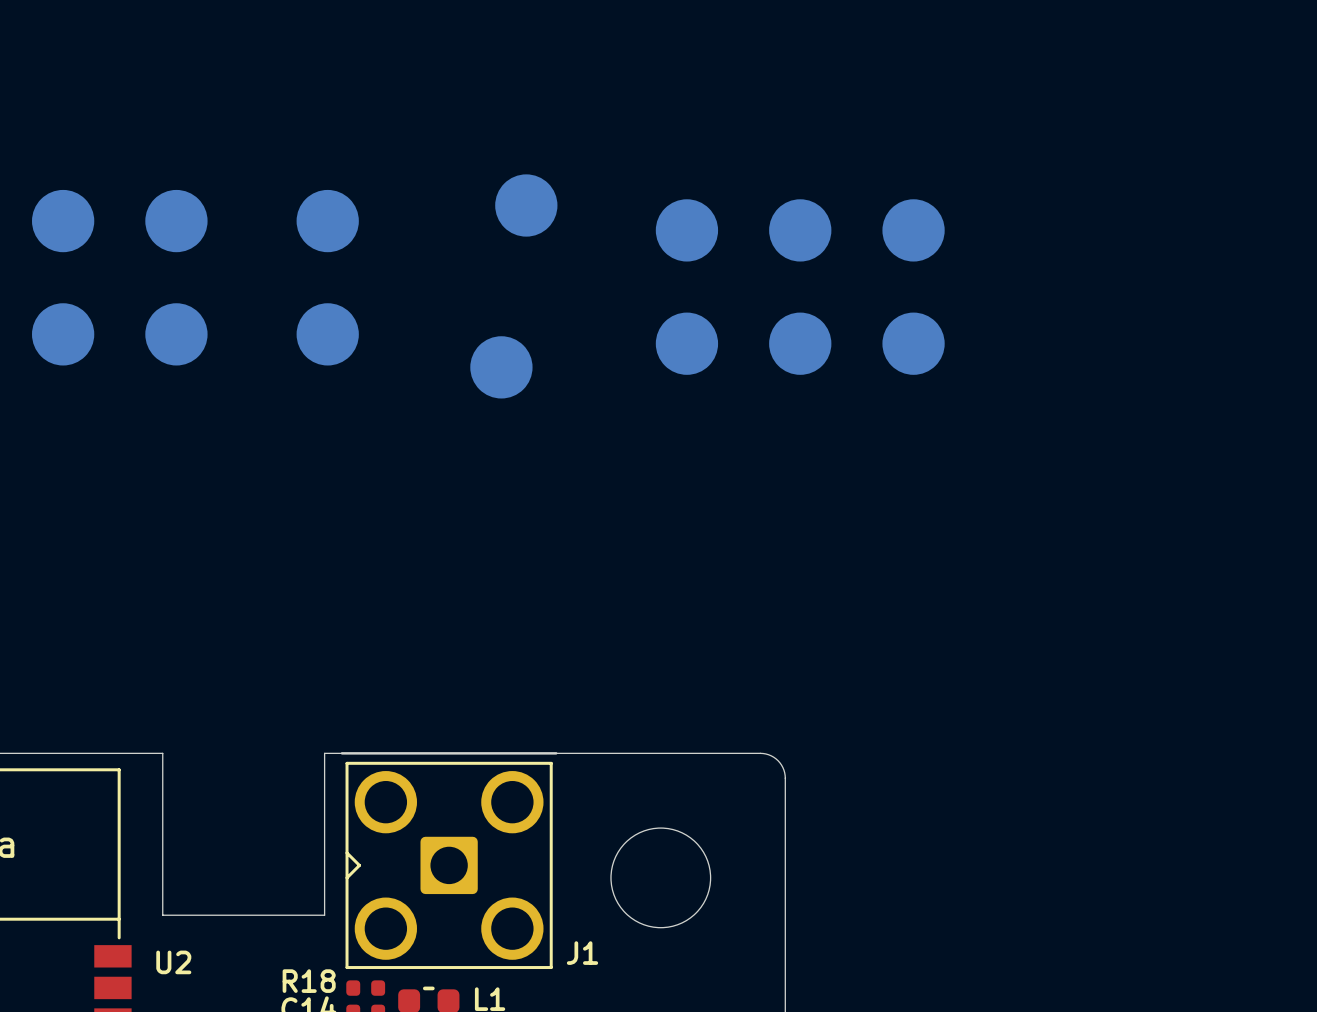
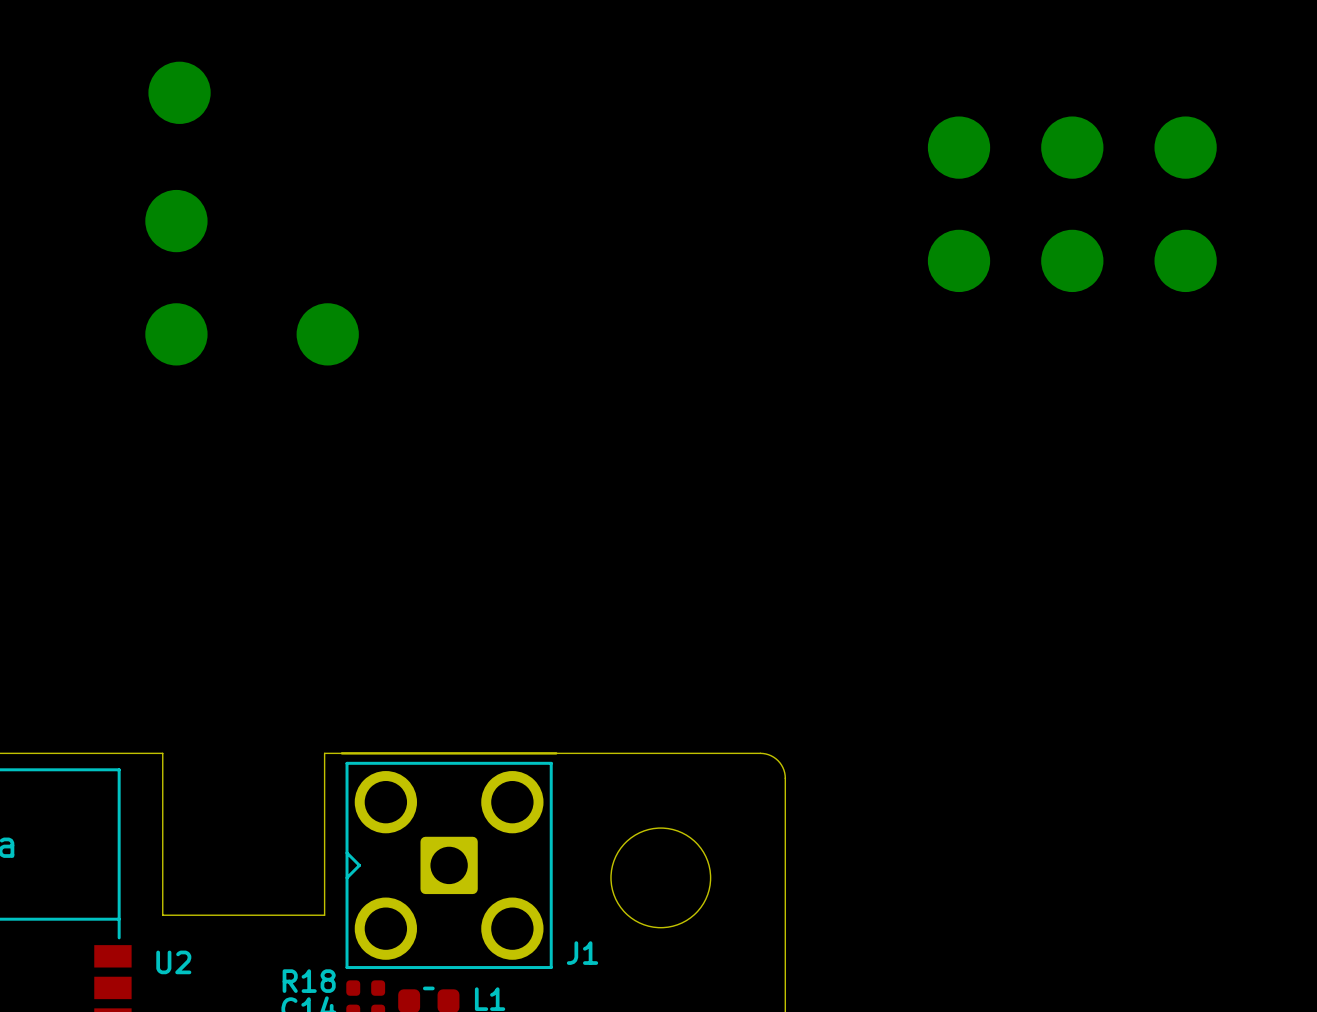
part: none -> (179, 92)
part: none -> (959, 147)
part: none -> (1072, 147)
part: none -> (1185, 147)
part: (526, 205) -> none
part: (63, 221) -> none
part: (327, 221) -> none
part: (686, 230) -> none
part: (800, 230) -> none
part: (913, 230) -> none
part: none -> (959, 260)
part: none -> (1072, 260)
part: none -> (1185, 260)
part: (63, 334) -> none
part: (686, 343) -> none
part: (800, 343) -> none
part: (913, 343) -> none
part: (501, 367) -> none

